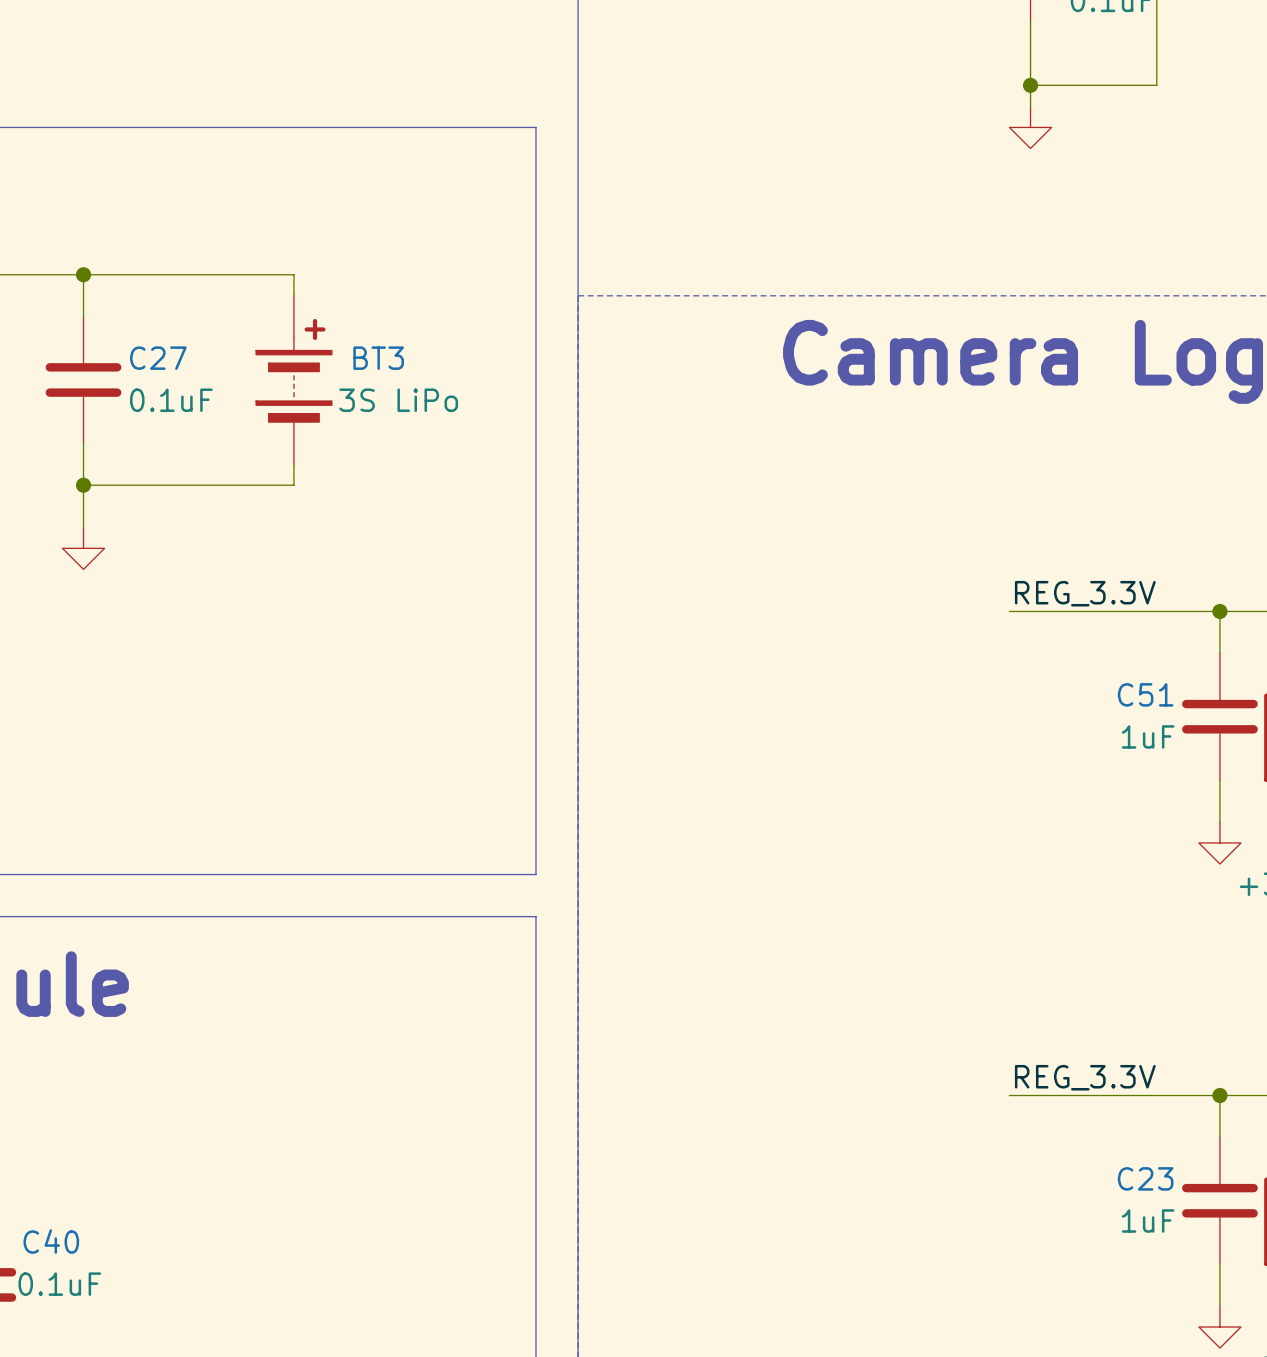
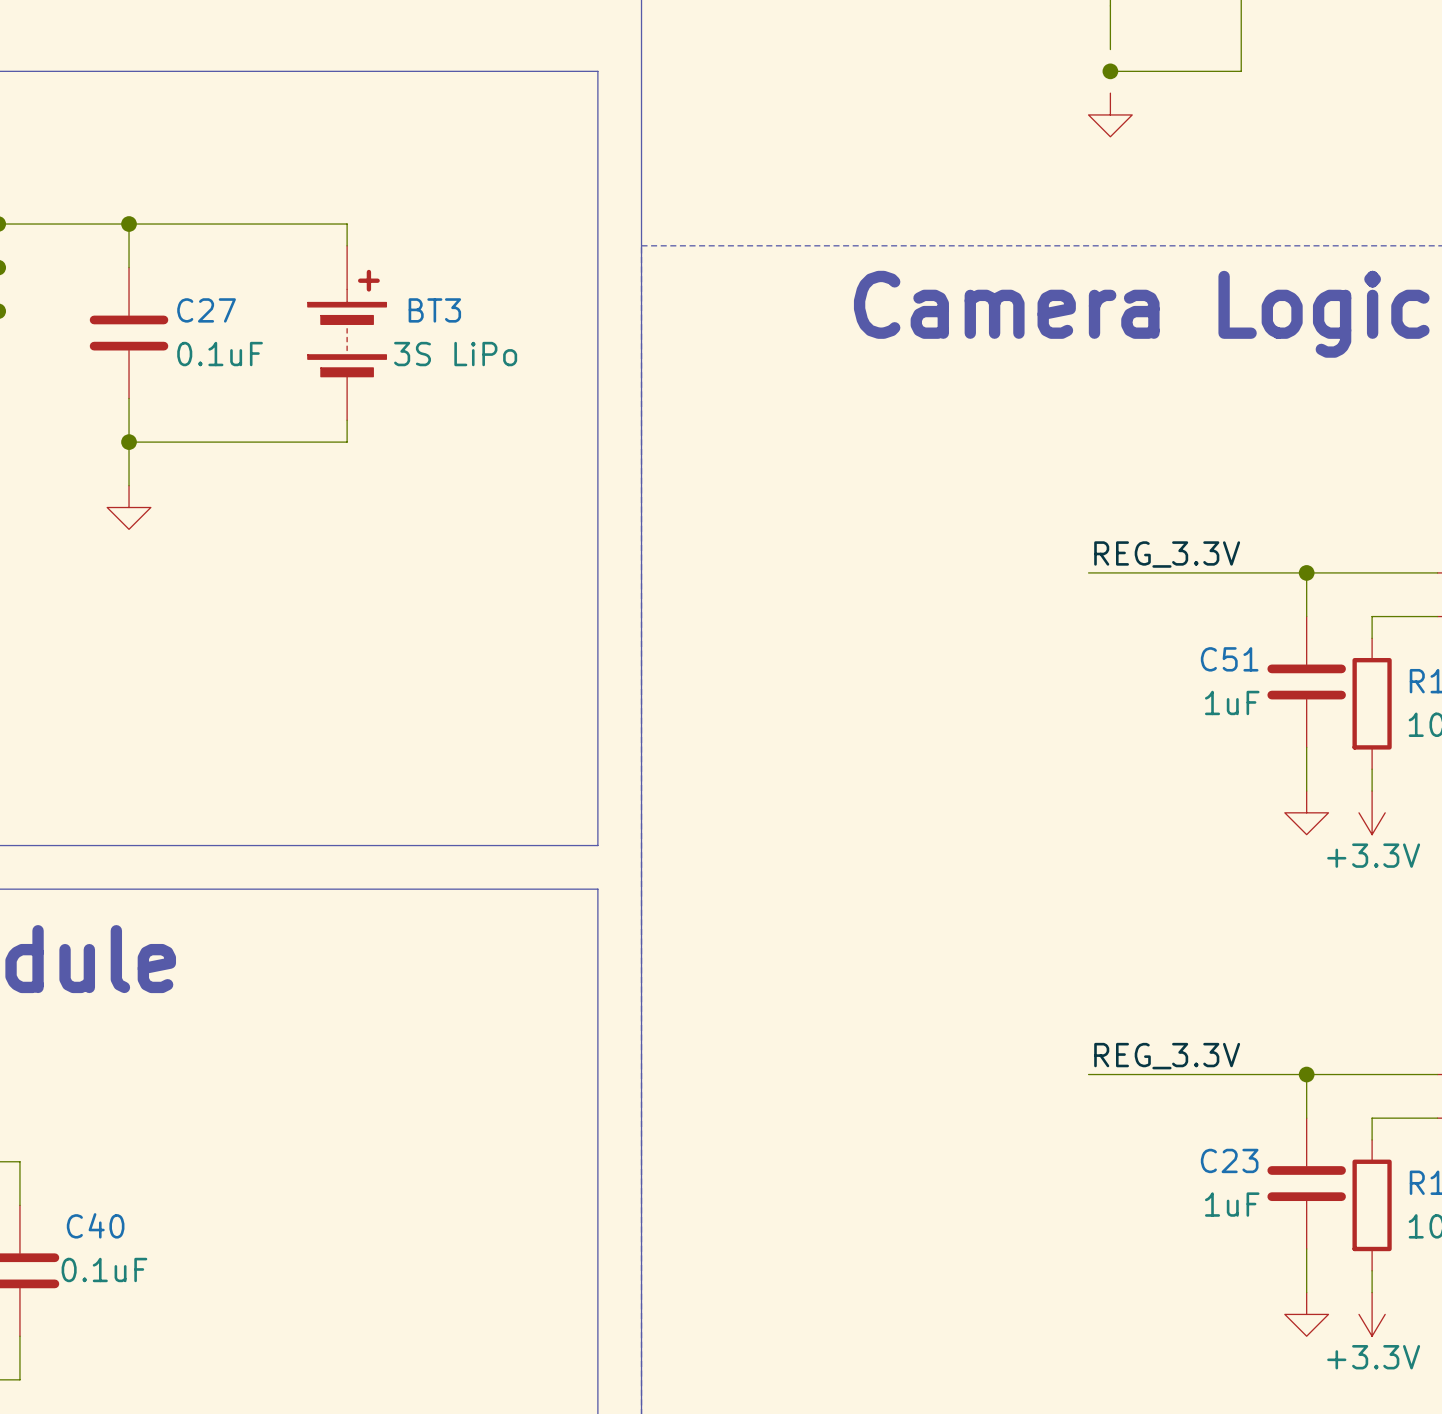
wire: (1030, 85) (1156, 85) -> (1110, 71) (1241, 71) (1241, 27)
junction position: (1030, 85) -> (1110, 71)
power symbol position: (1030, 127) -> (1110, 114)

